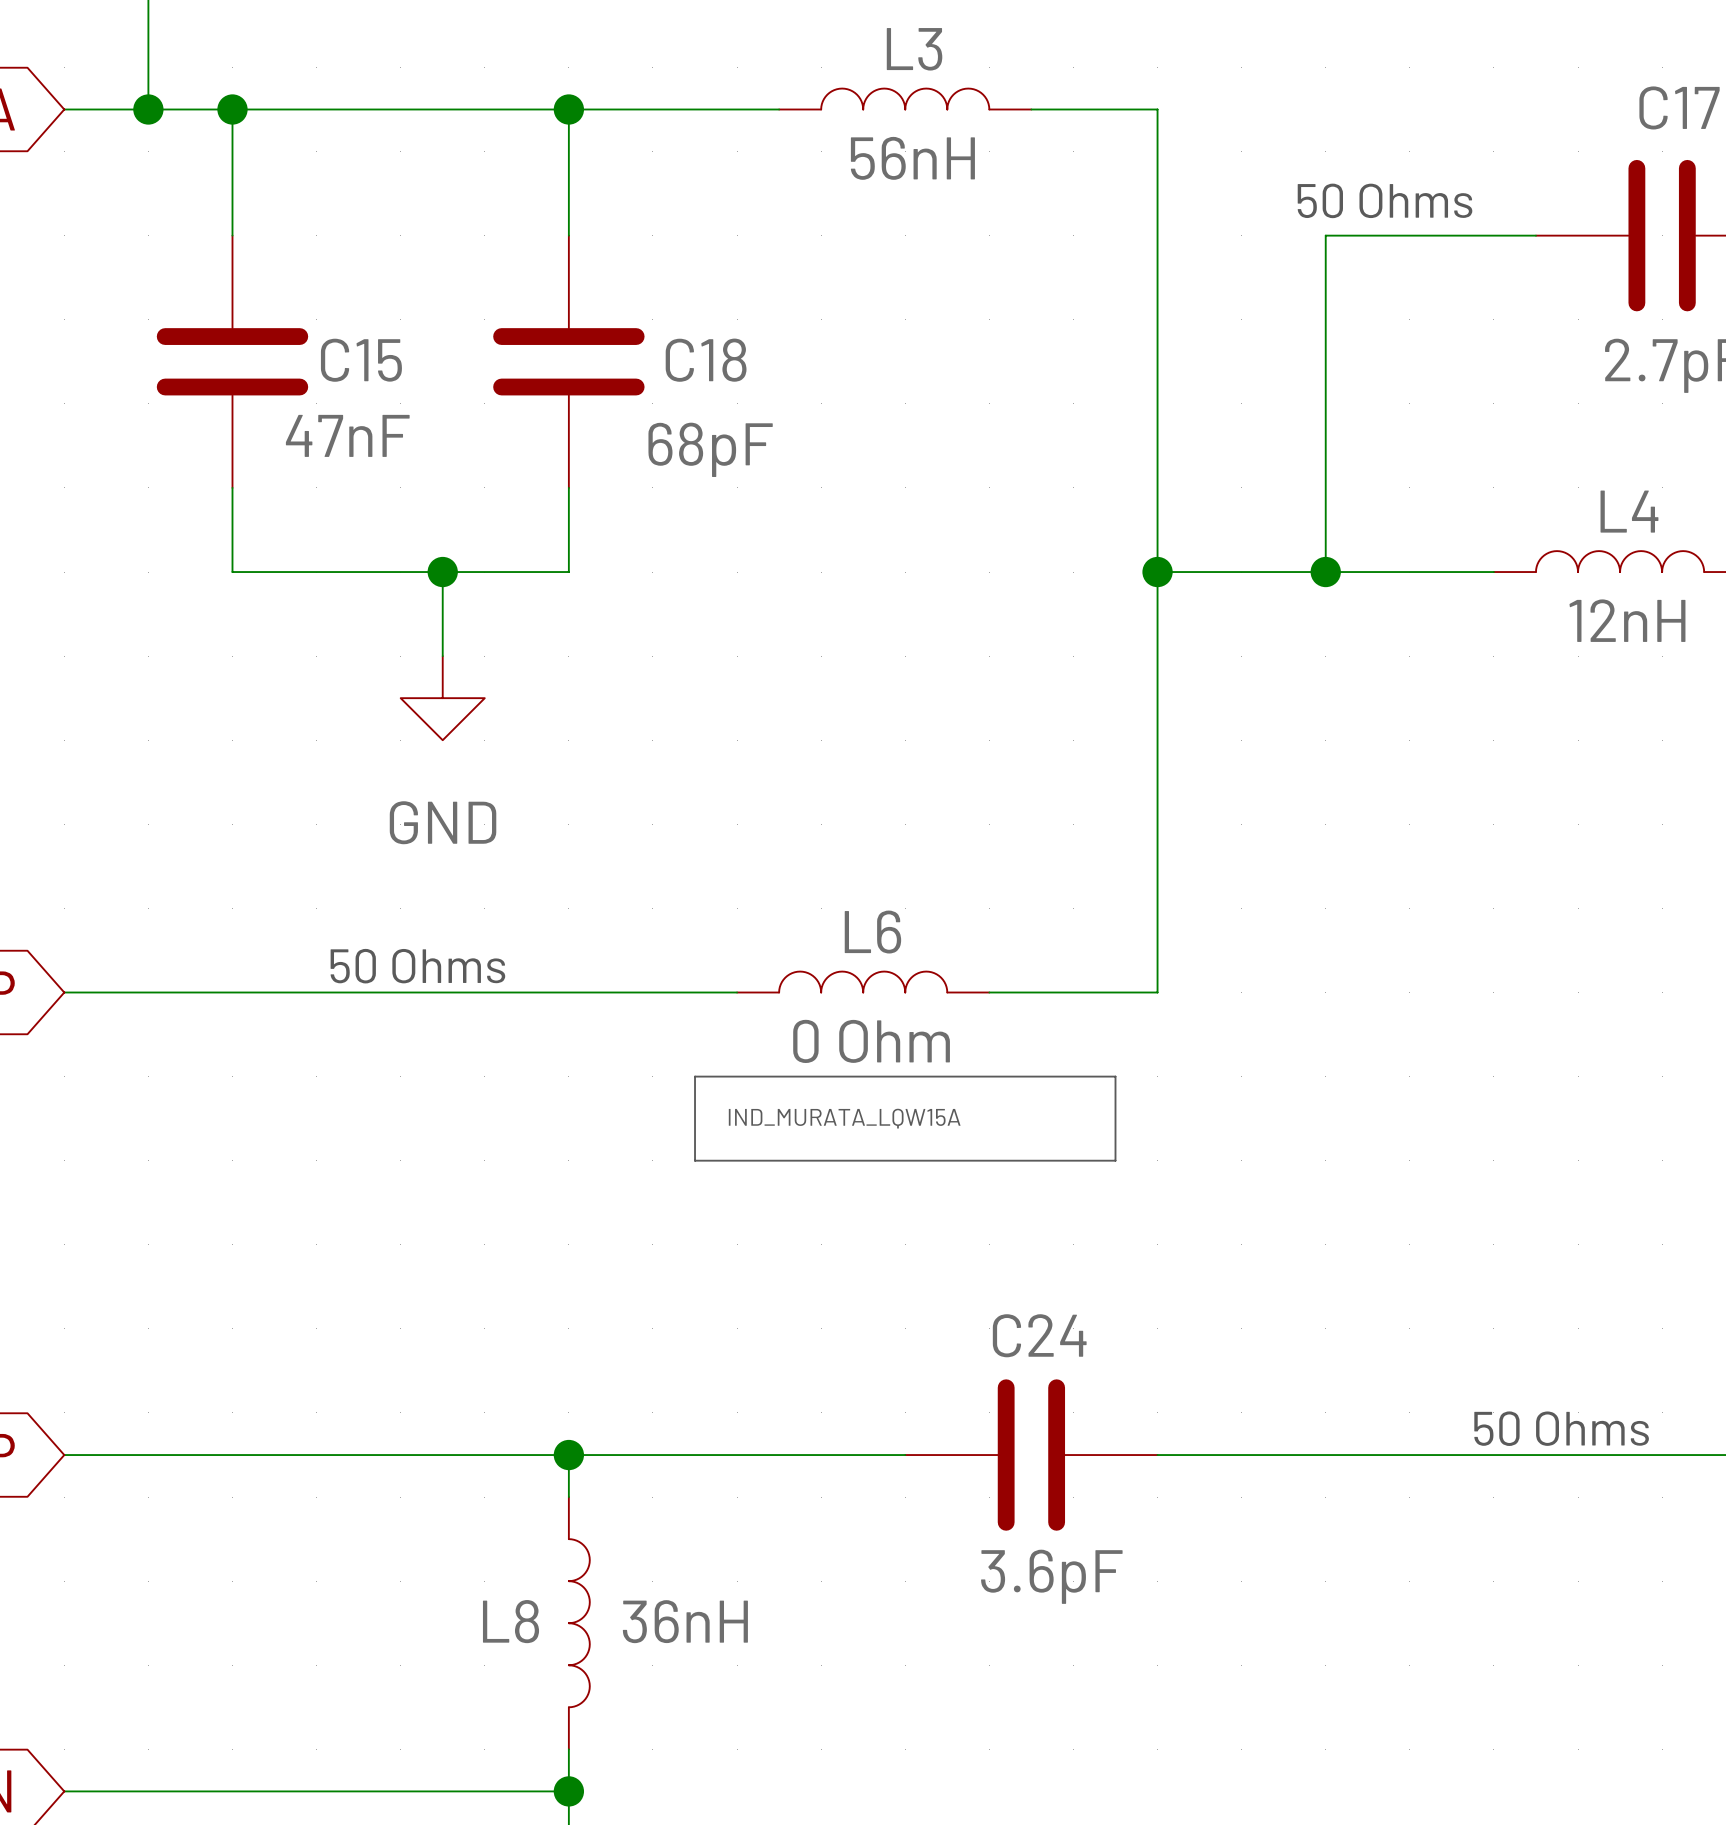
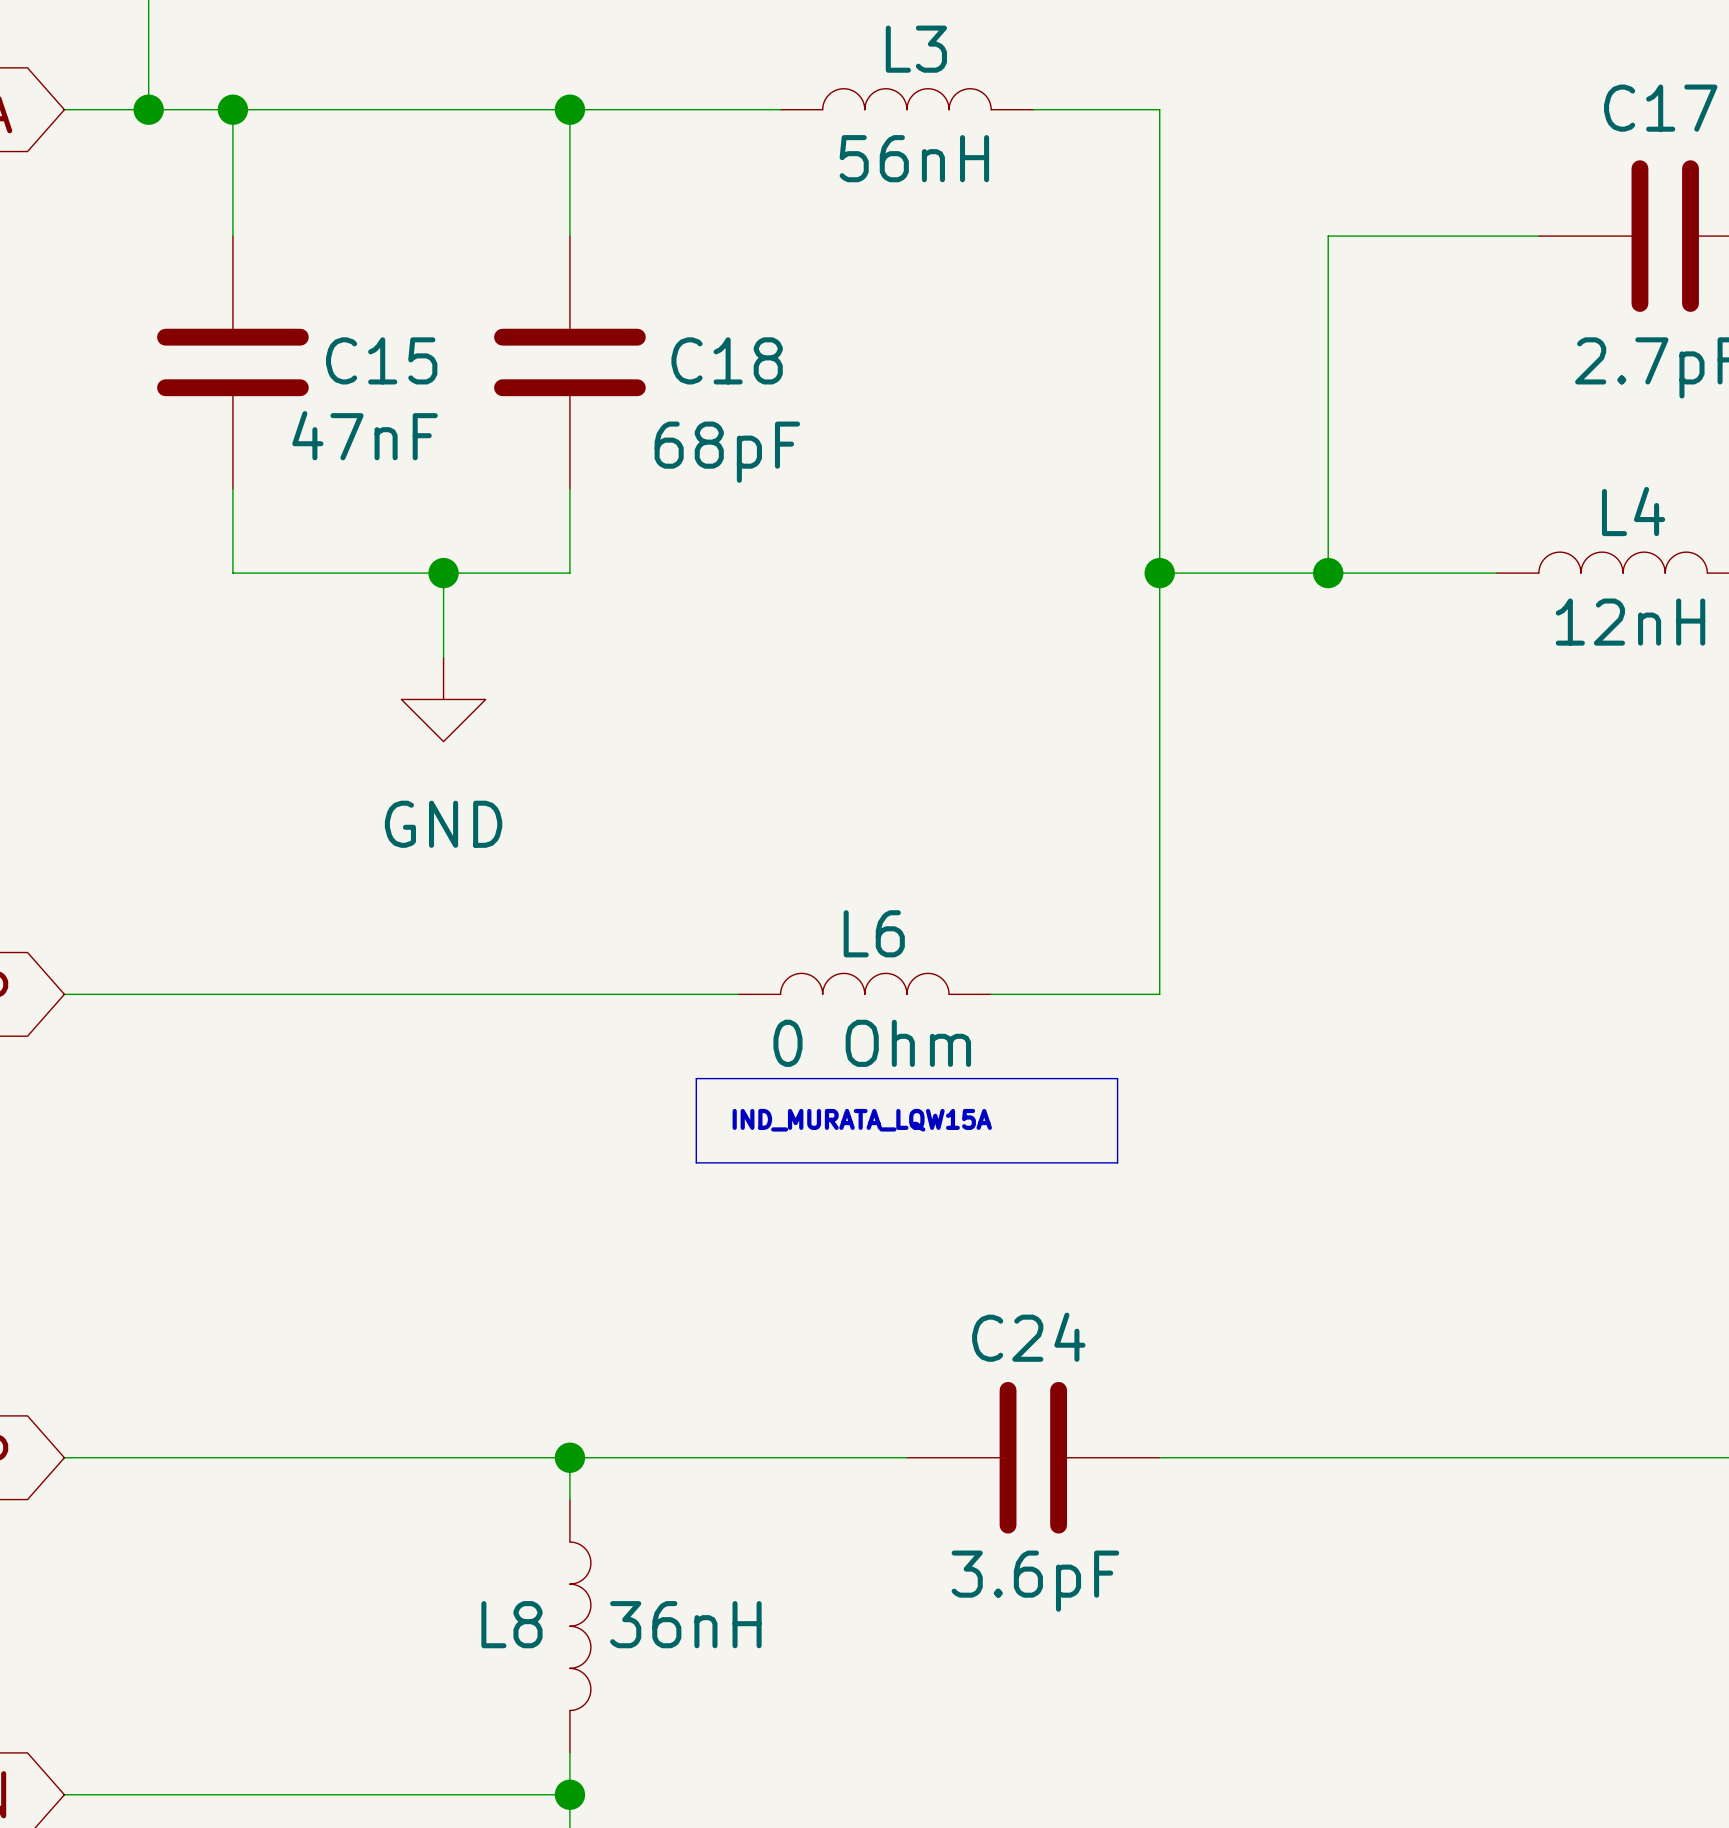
text: 50 Ohms (1385, 200) -> none
text: 50 Ohms (417, 966) -> none
text: 50 Ohms (1561, 1428) -> none

